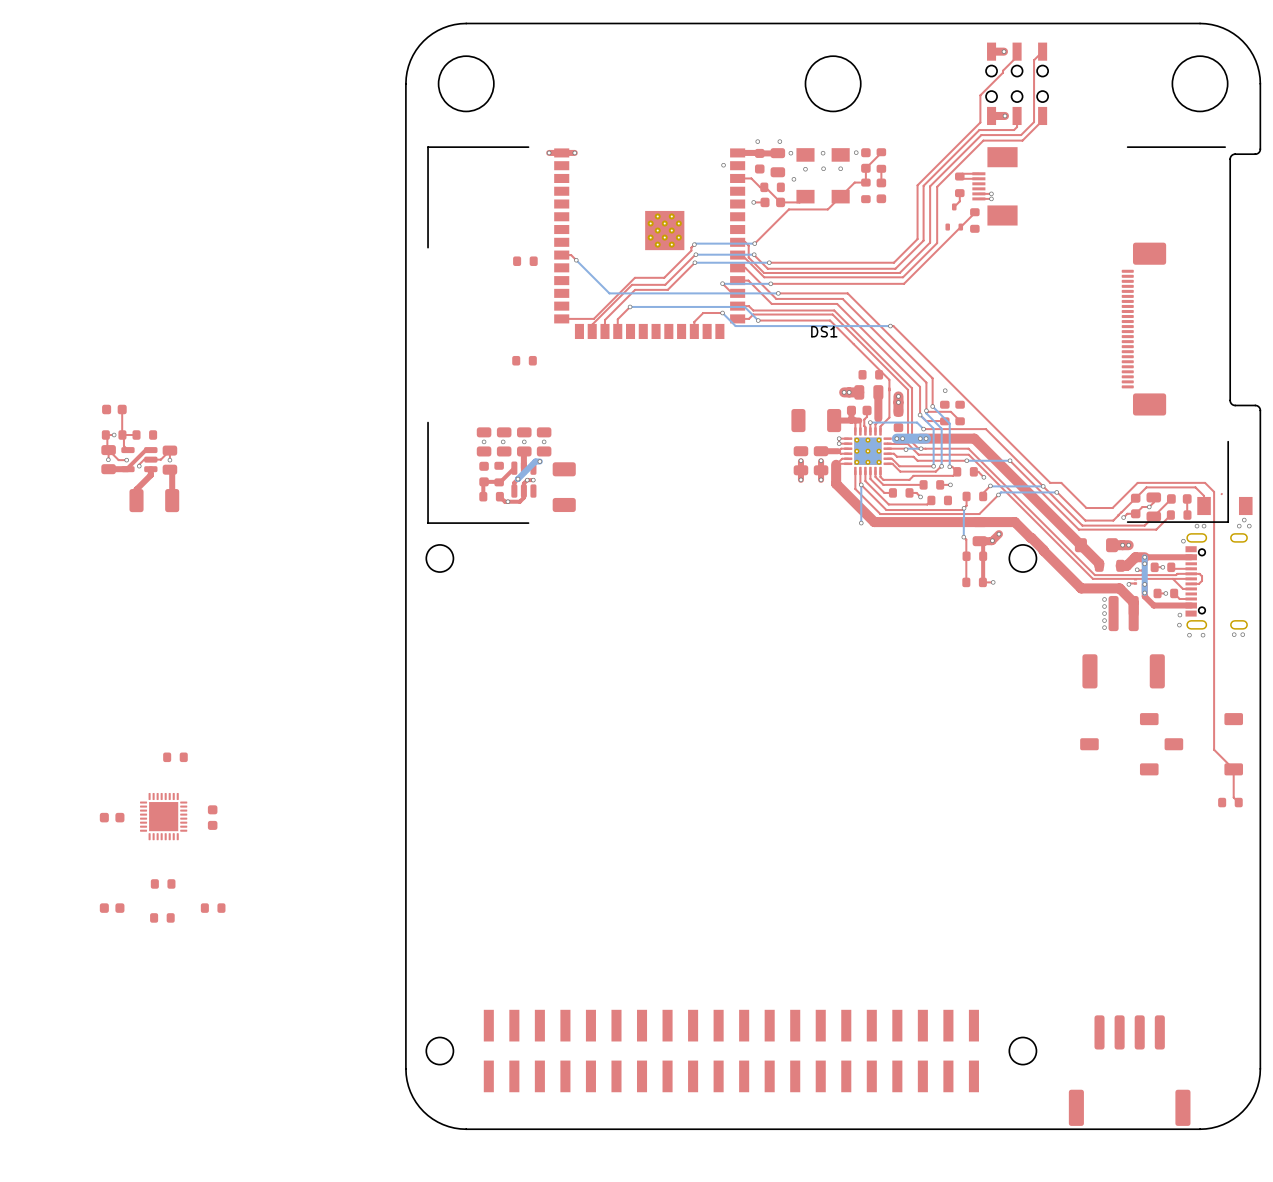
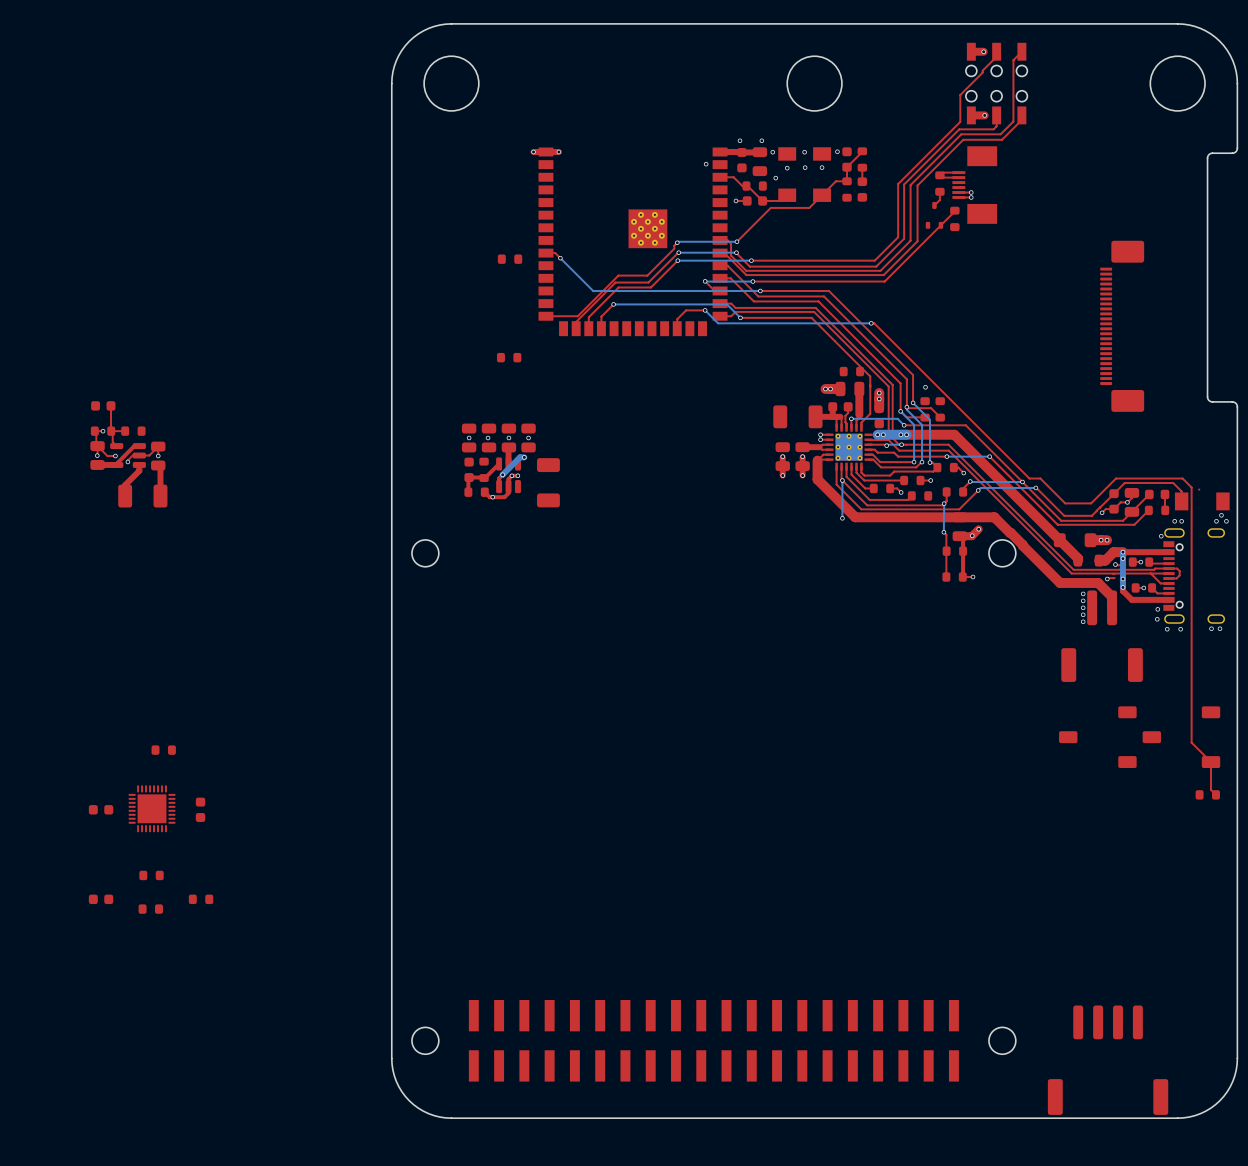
DS1: (828, 335) -> none

